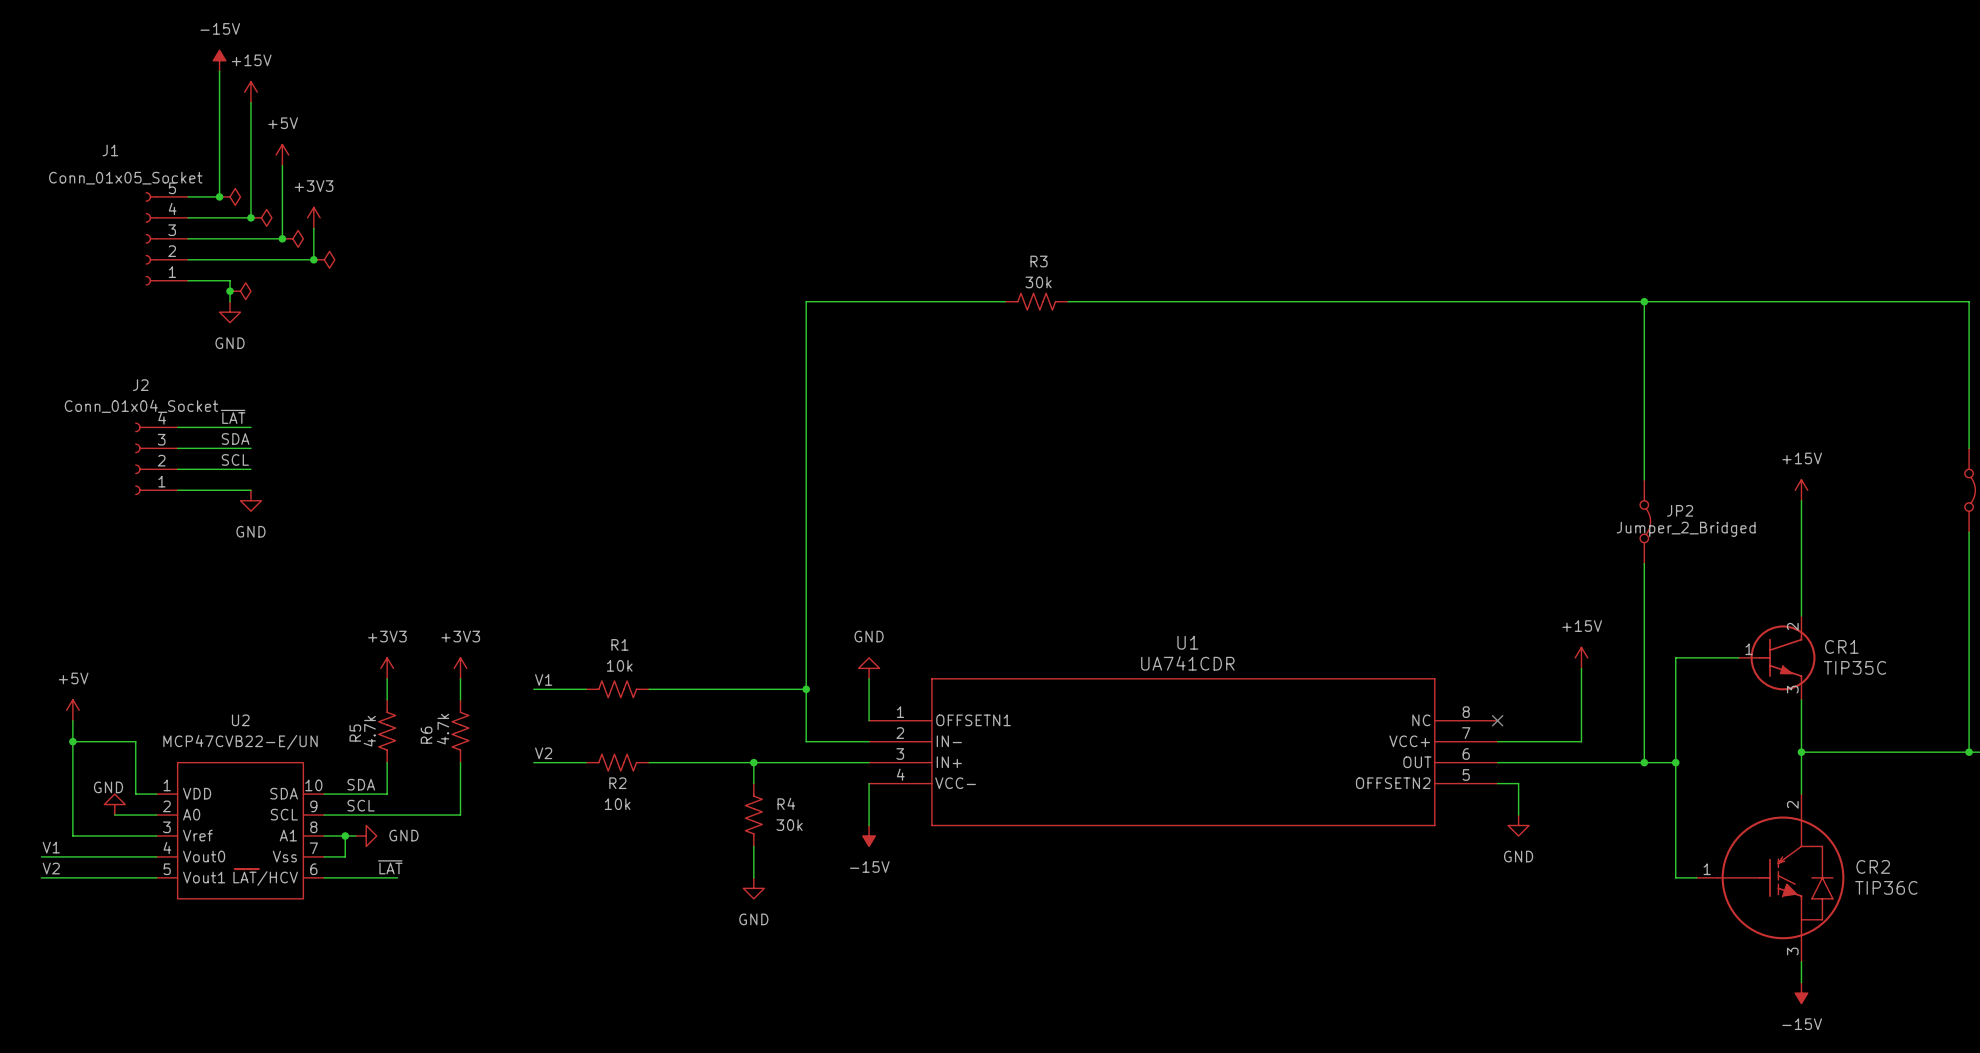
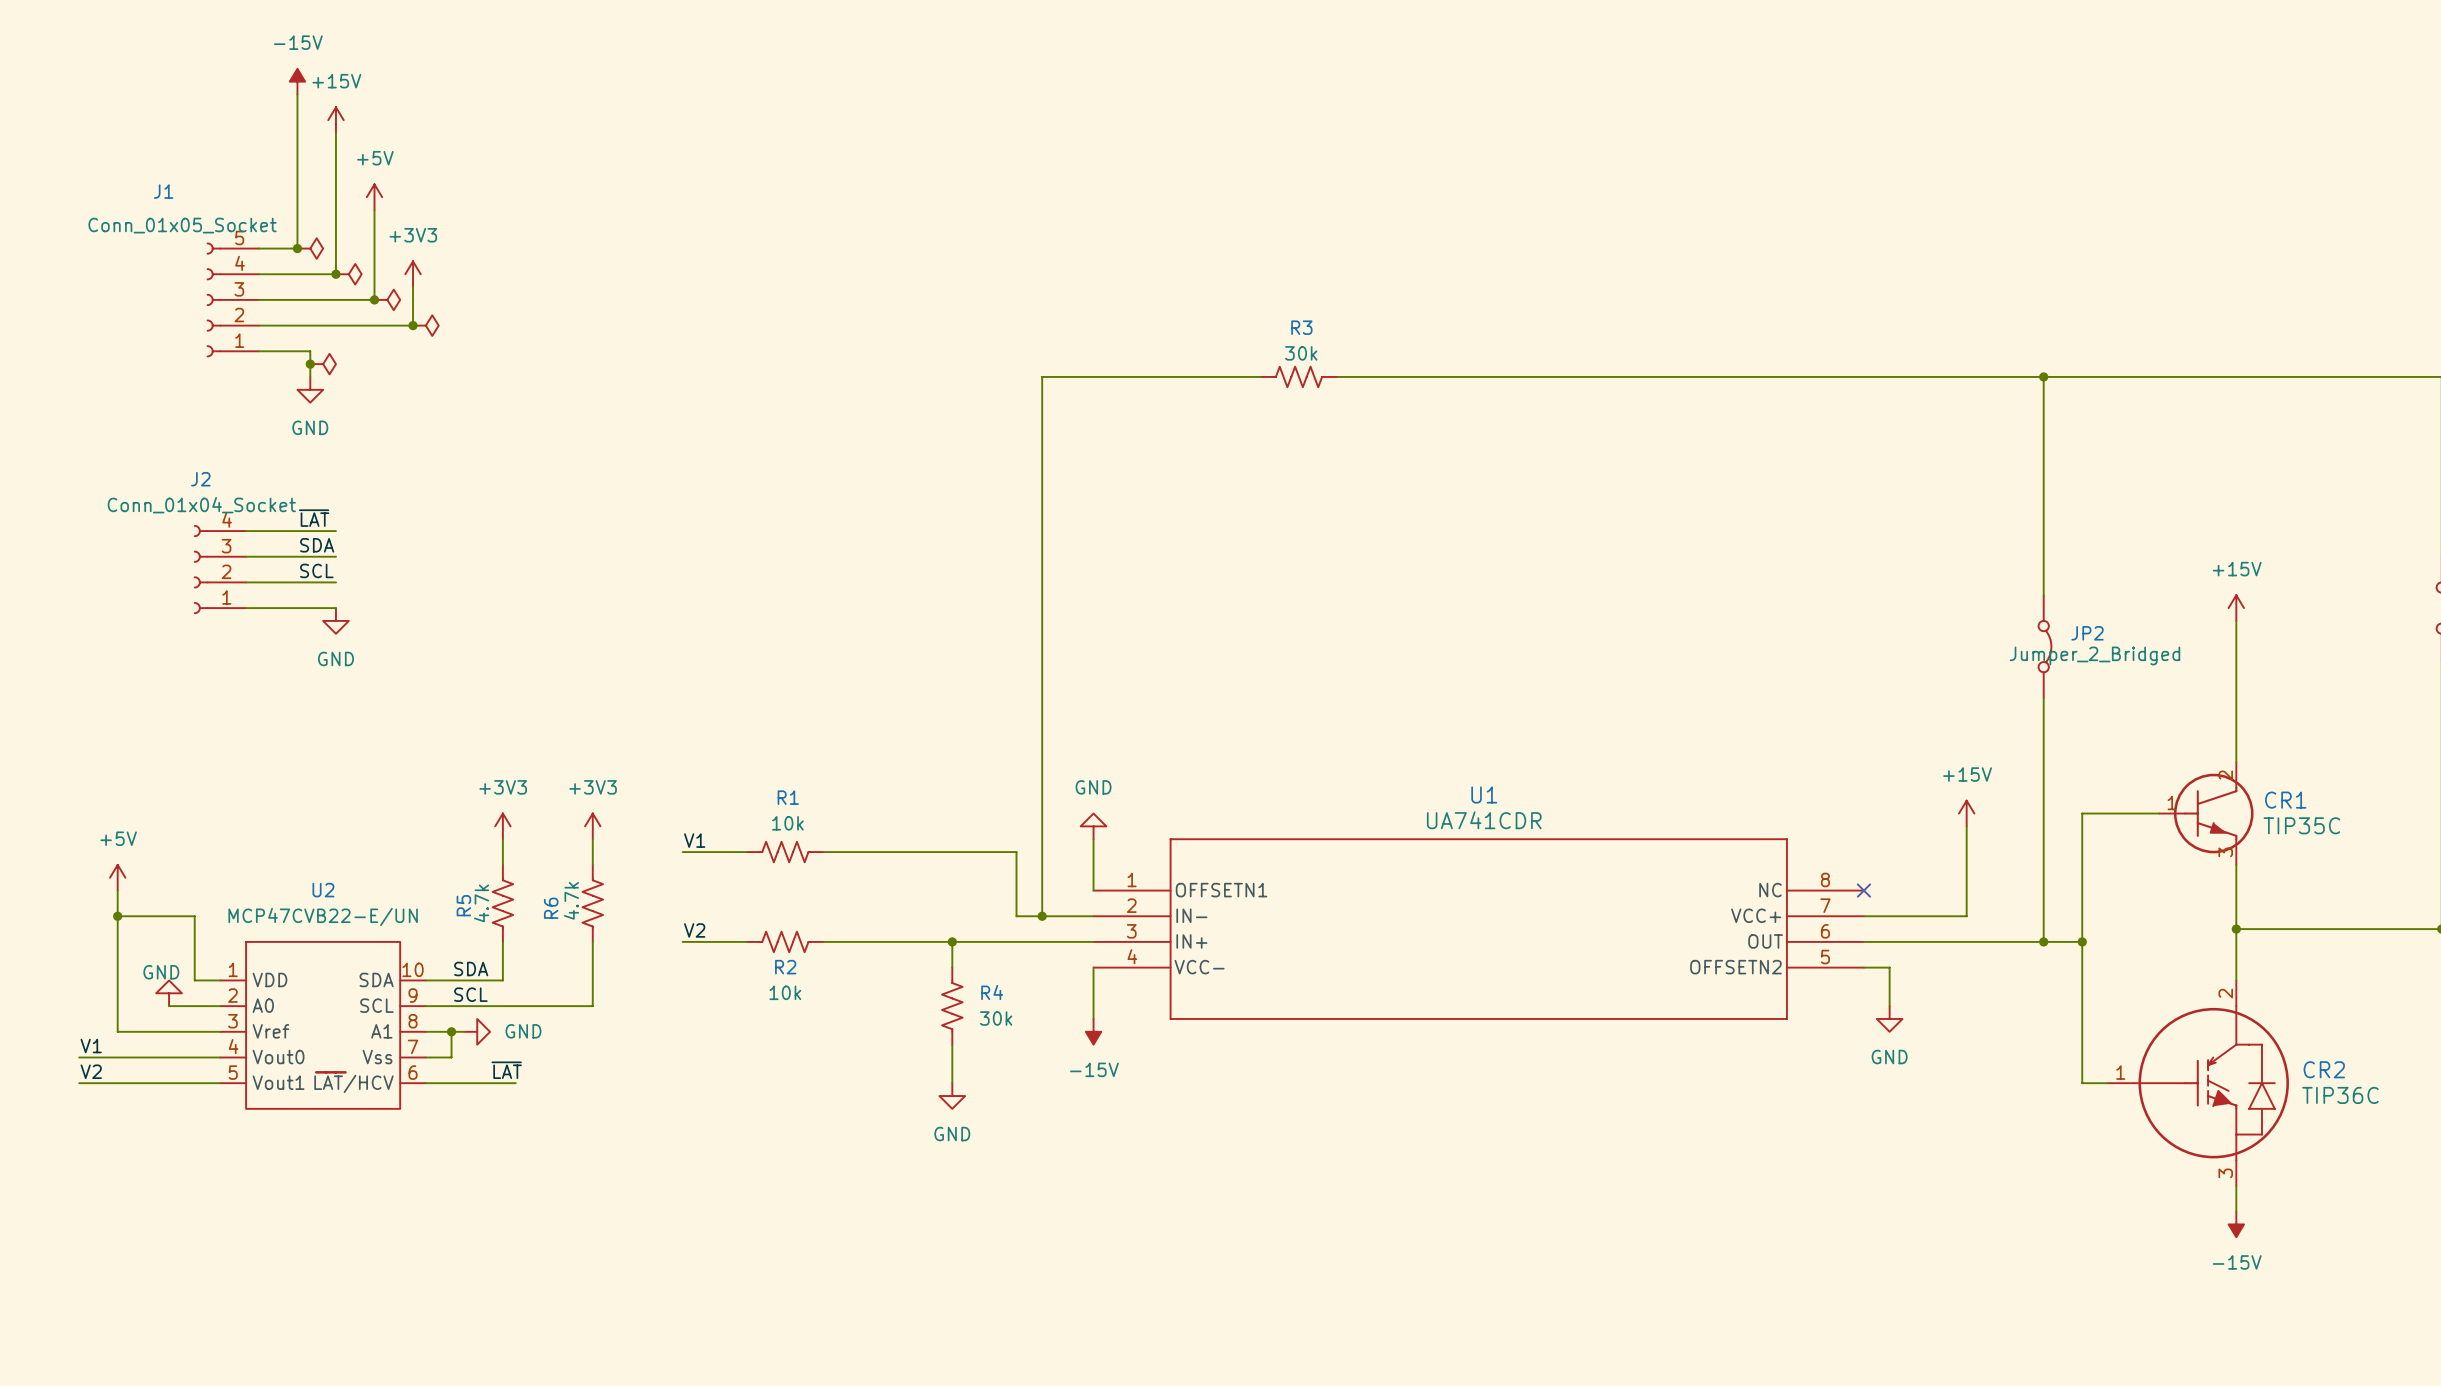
wire: (827, 301) (806, 301) (806, 689) -> (1042, 376) (1042, 916)
junction: (806, 689) -> none
junction: none -> (1042, 916)

